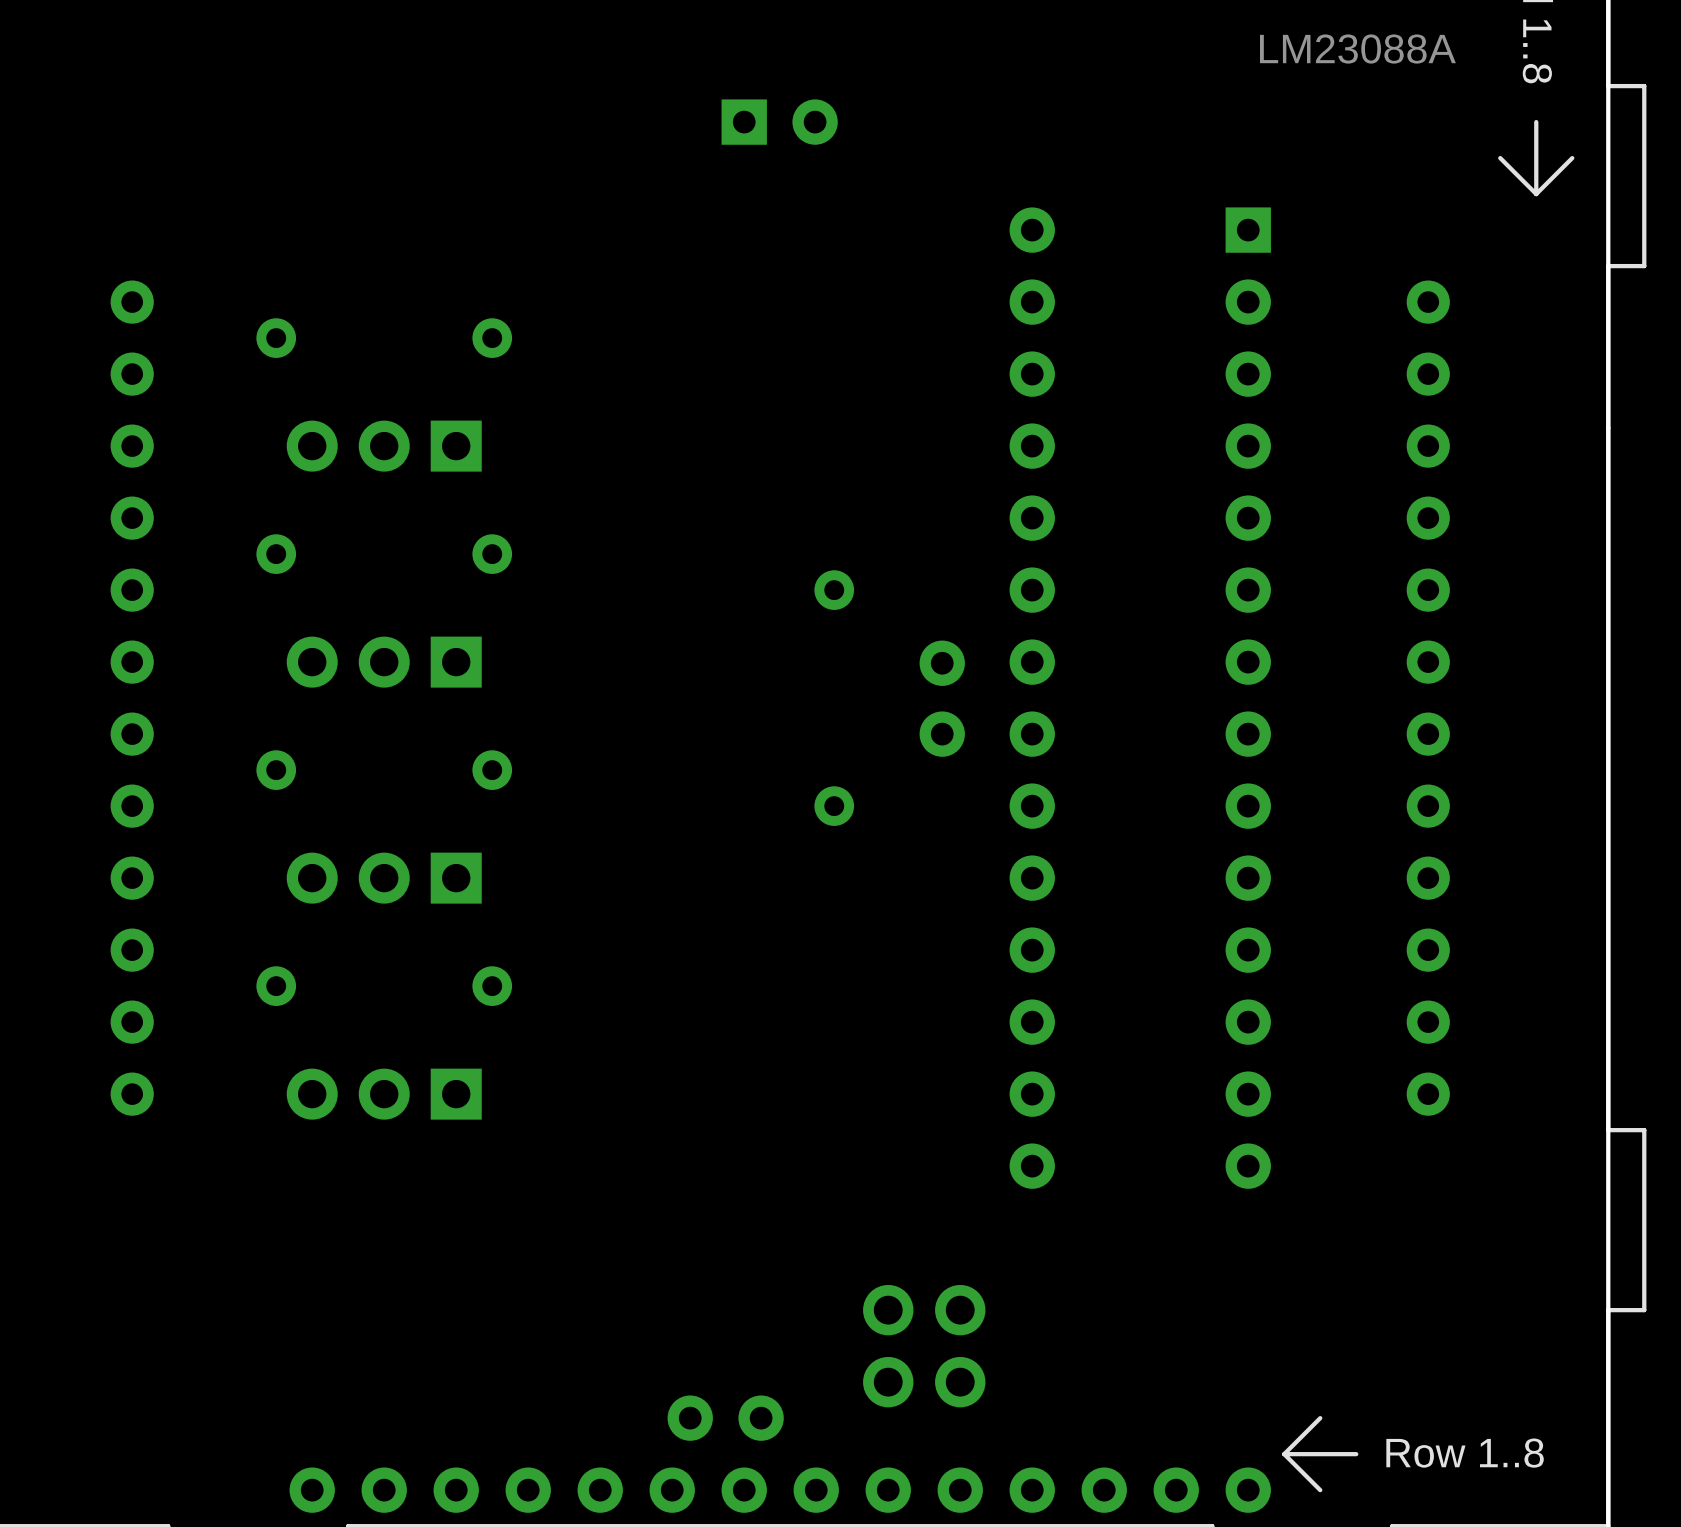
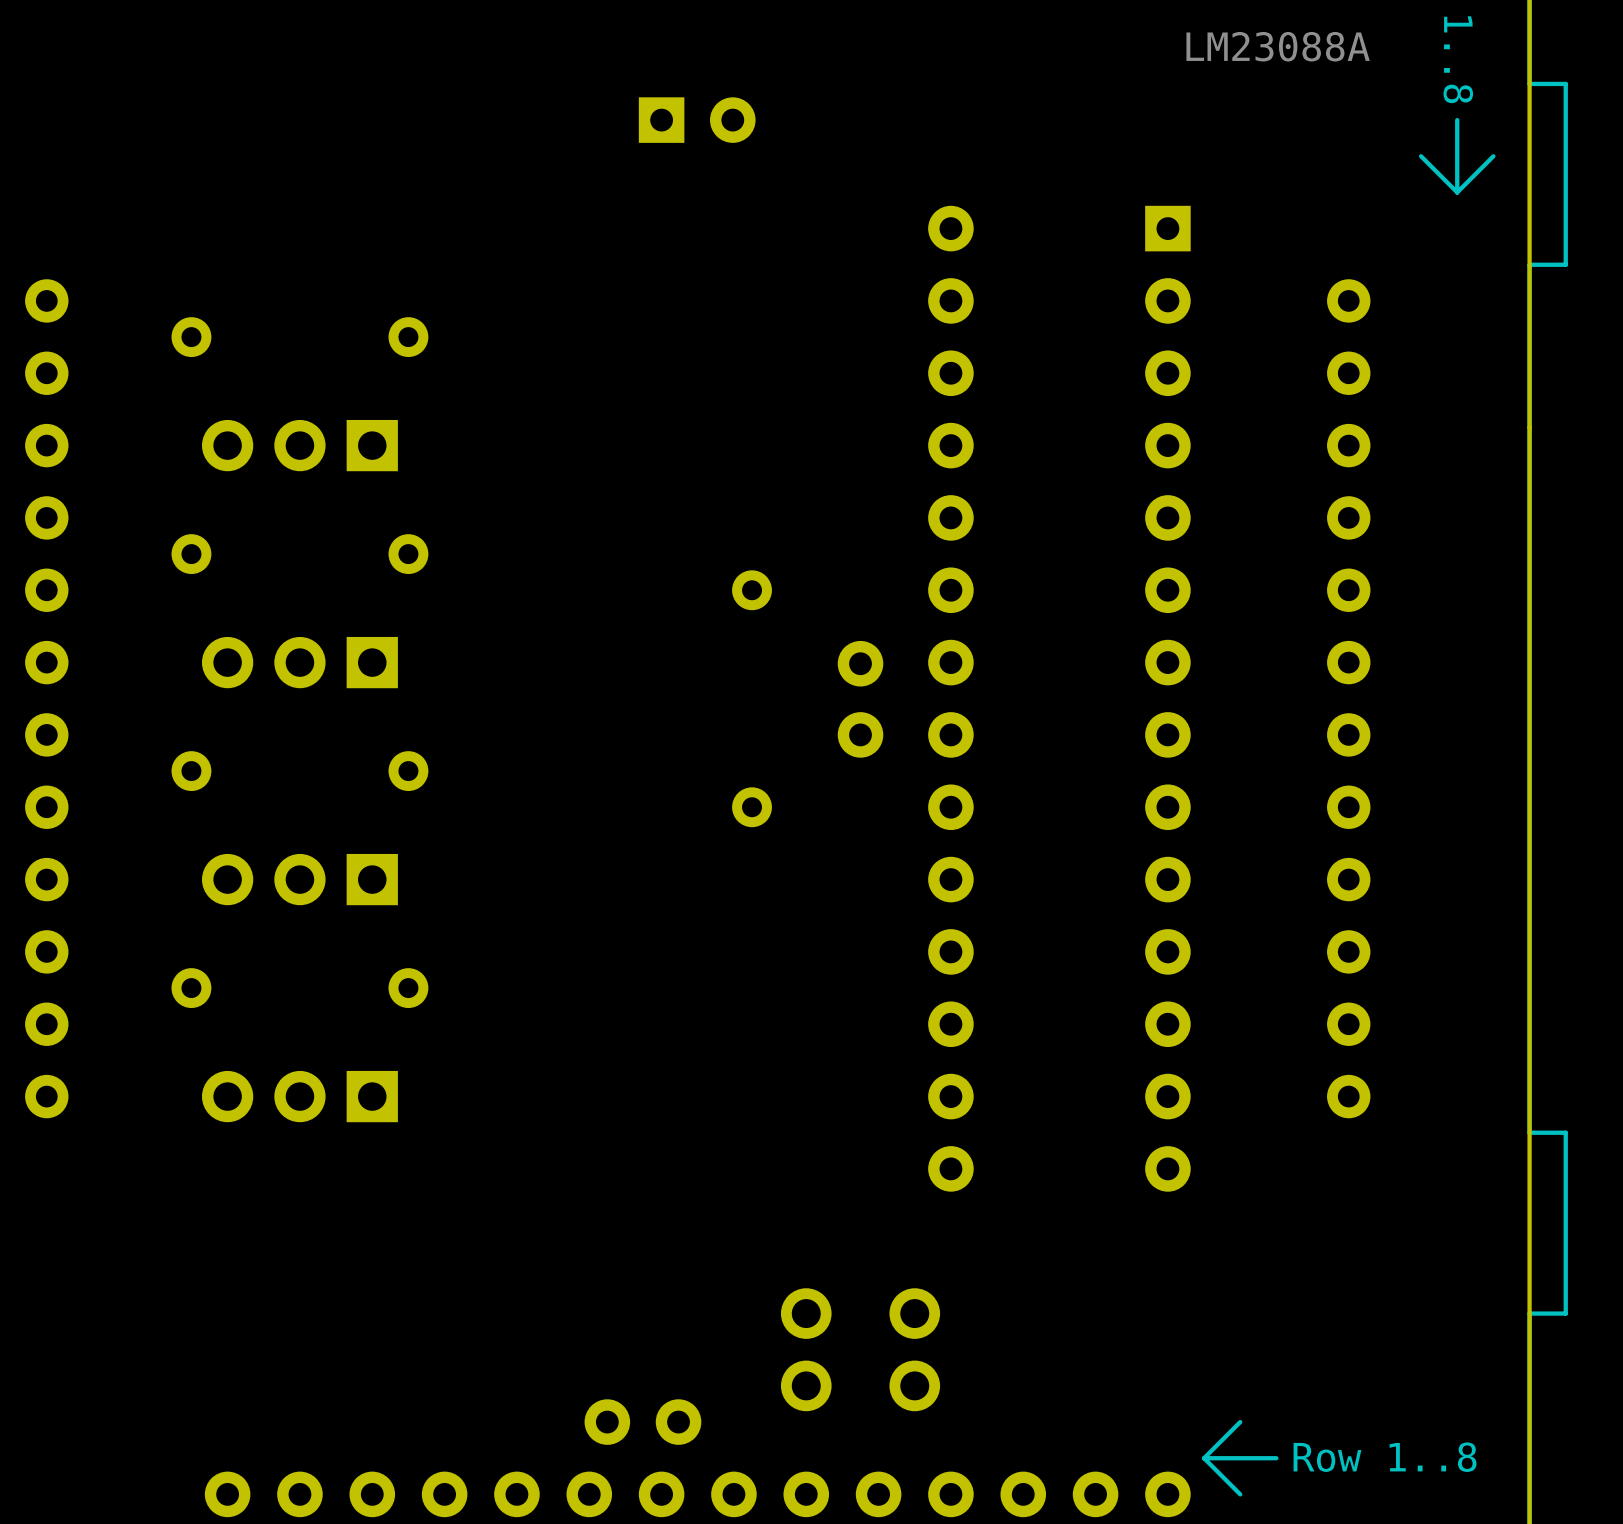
part position: (960, 1346) -> (914, 1349)

